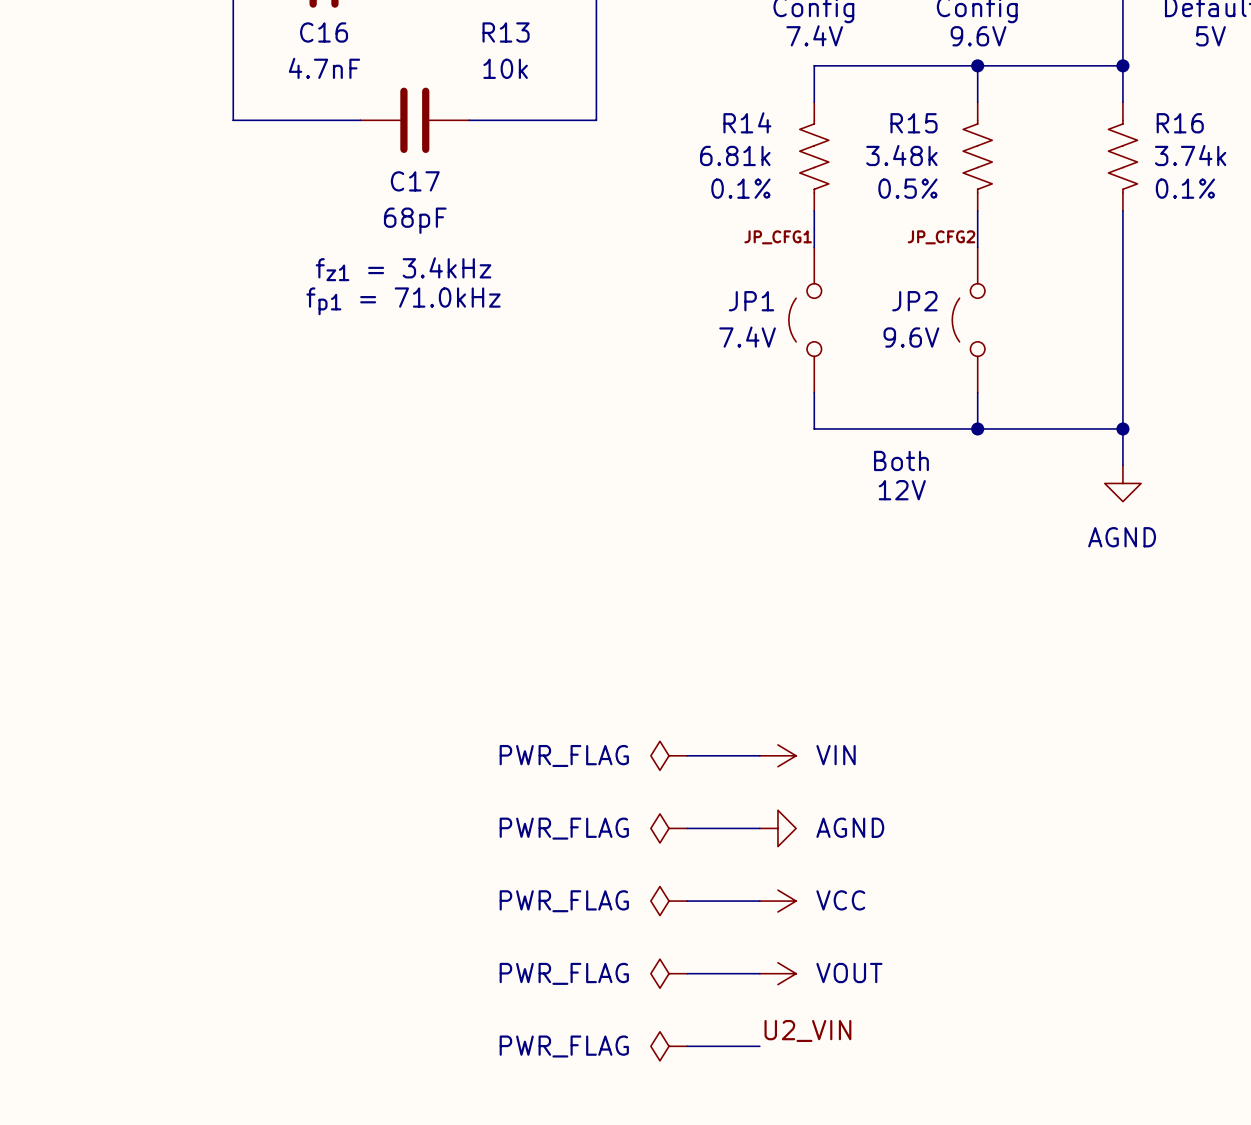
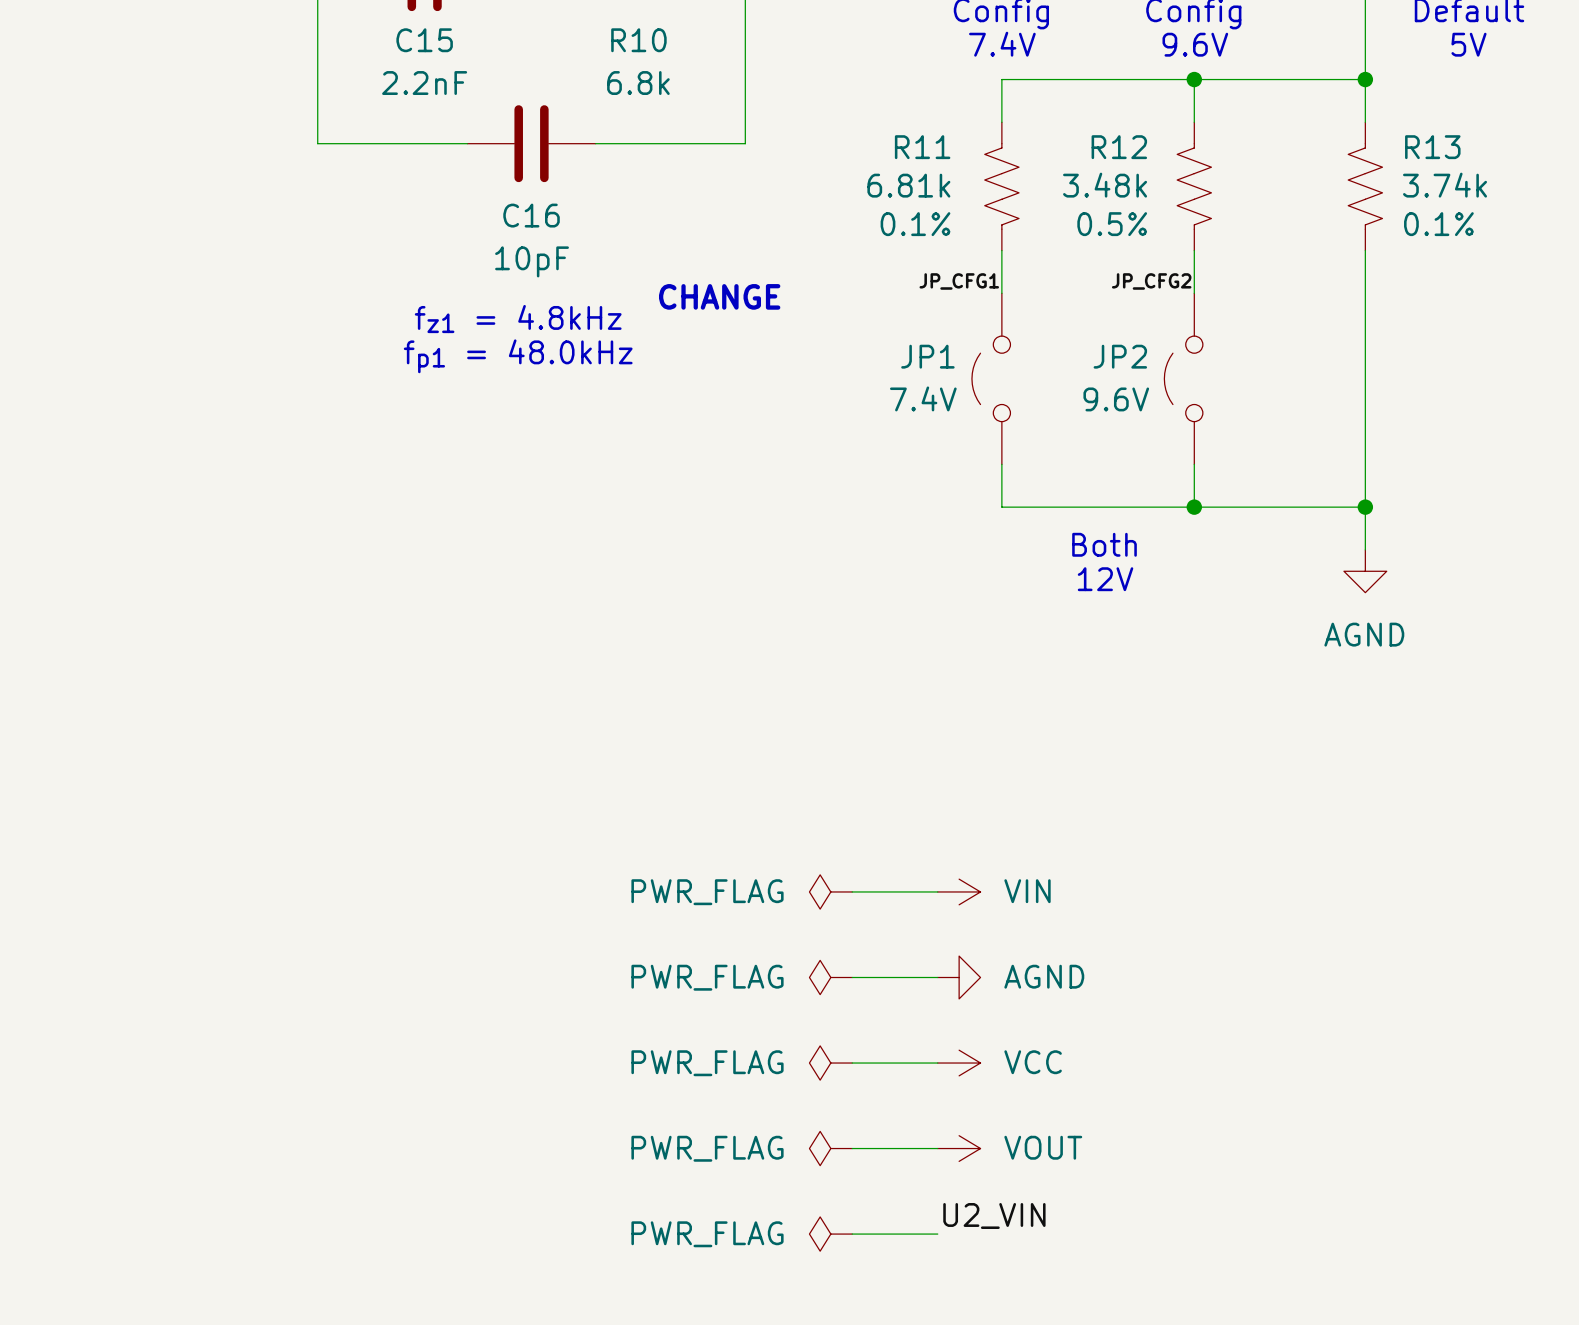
C16 name: C16 (324, 32) -> C15 (424, 40)
R13 name: R13 (506, 32) -> R10 (638, 40)
C16 value: 4.7nF (324, 68) -> 2.2nF (424, 83)
R13 value: 10k (505, 68) -> 6.8k (638, 83)
R14 name: R14 (747, 122) -> R11 (922, 147)
R15 name: R15 (914, 123) -> R12 (1119, 147)
R16 name: R16 (1180, 123) -> R13 (1432, 147)
C17 name: C17 (415, 181) -> C16 (531, 215)
C17 value: 68pF (415, 220) -> 10pF (532, 261)
text: none -> CHANGE (719, 296)
text: fz1 = 3.4kHz (403, 269) -> fz1 = 4.8kHz (518, 319)
text: fp1 = 71.0kHz (403, 301) -> fp1 = 48.0kHz (518, 356)

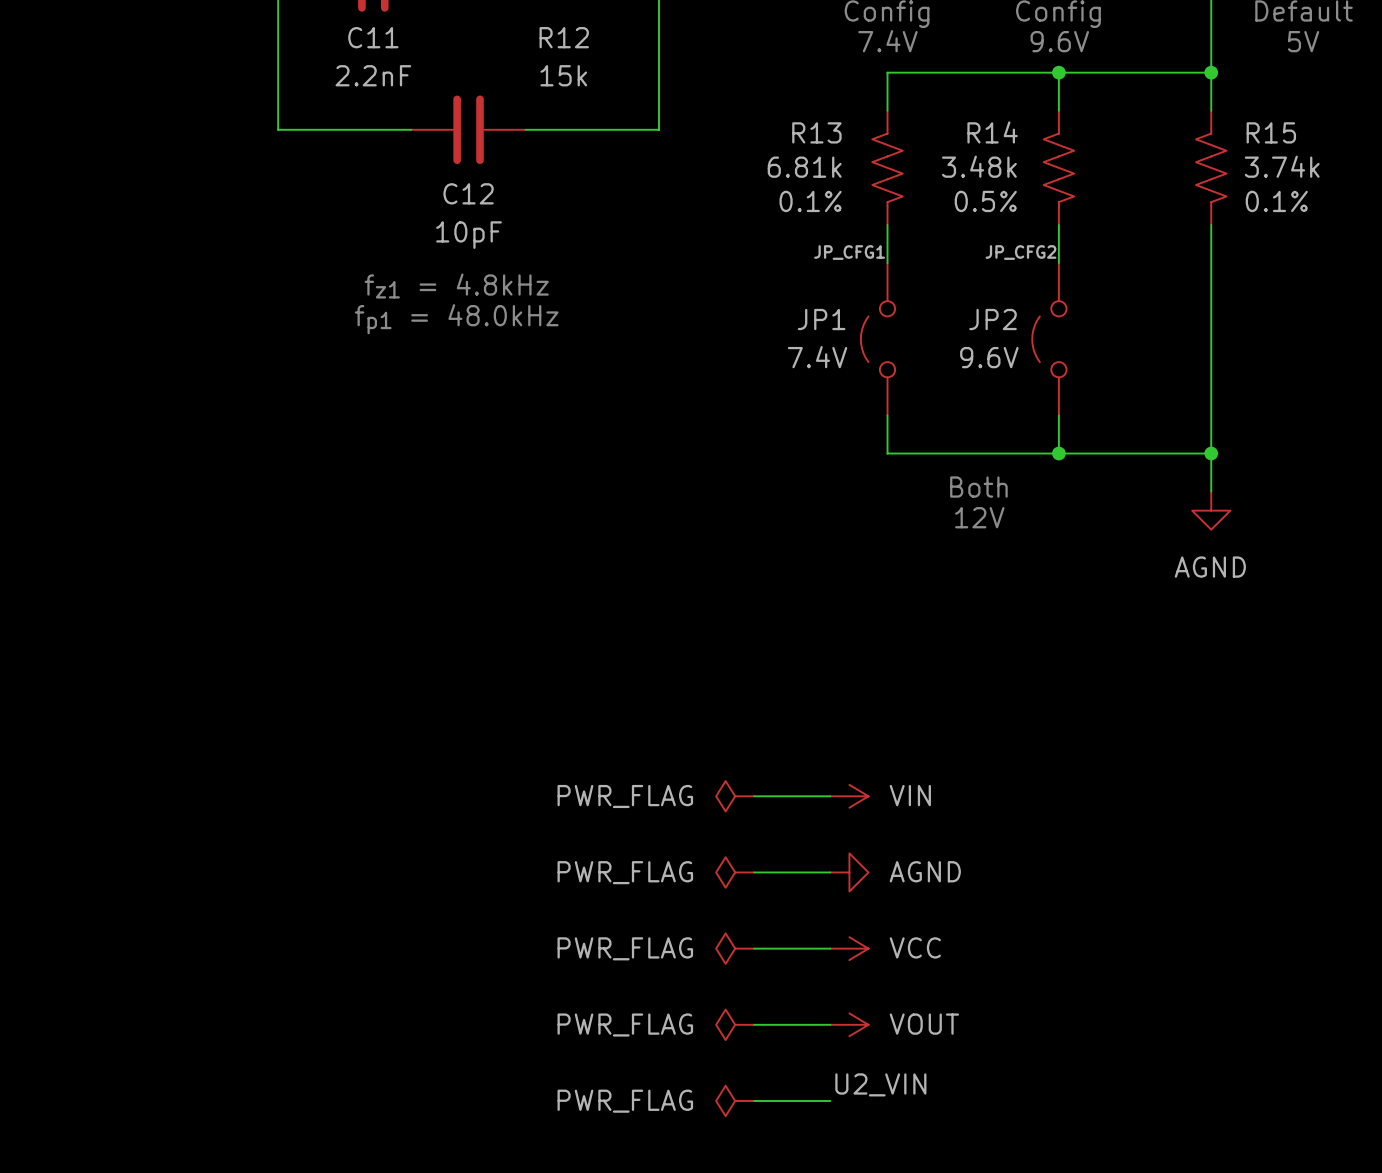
C15 name: C15 (424, 40) -> C11 (373, 37)
R10 name: R10 (638, 40) -> R12 (564, 37)
R10 value: 6.8k (638, 83) -> 15k (563, 75)
R11 name: R11 (922, 147) -> R13 (816, 132)
R12 name: R12 (1119, 147) -> R14 (992, 132)
R13 name: R13 (1432, 147) -> R15 (1271, 132)
C16 name: C16 (531, 215) -> C12 (468, 193)
text: CHANGE (719, 296) -> none

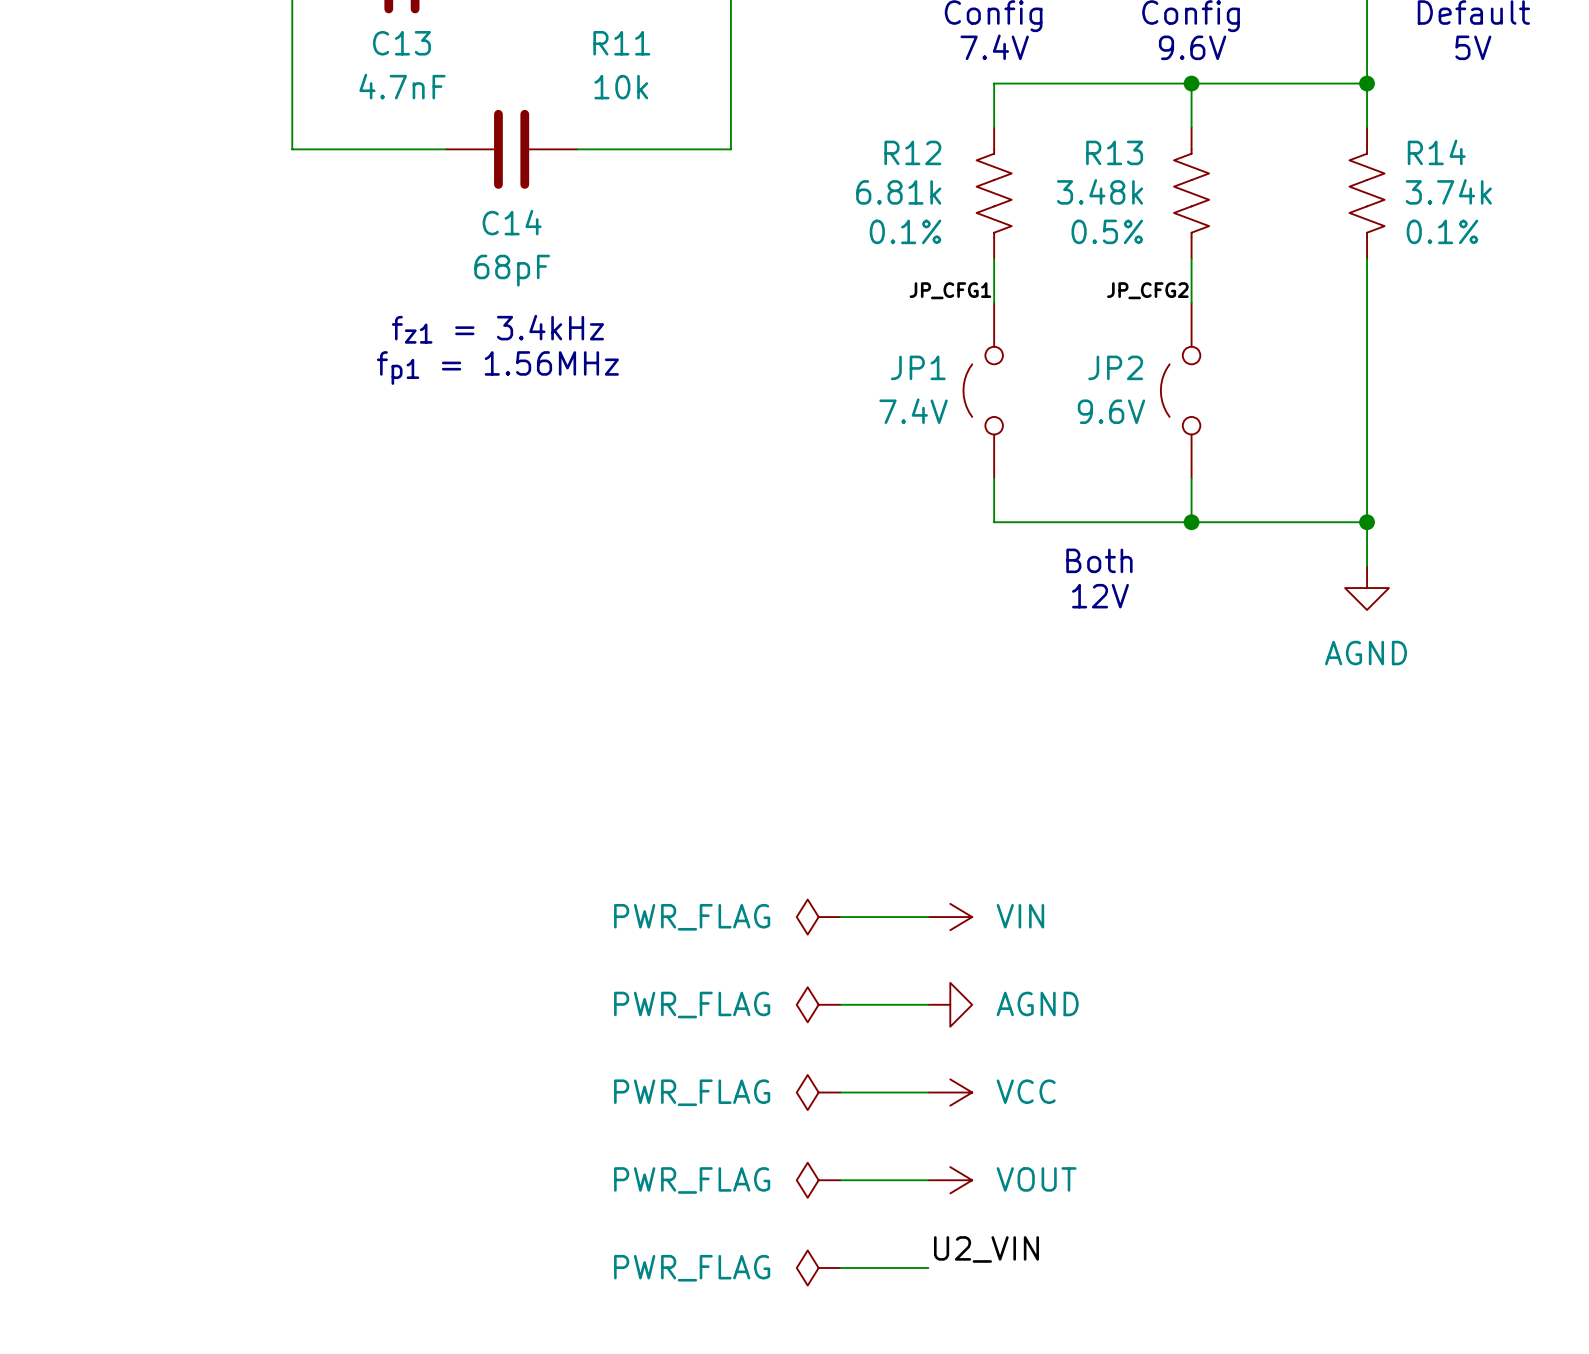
C11 name: C11 (373, 37) -> C13 (401, 43)
R12 name: R12 (564, 37) -> R11 (621, 43)
C11 value: 2.2nF (373, 75) -> 4.7nF (402, 86)
R12 value: 15k (563, 75) -> 10k (621, 87)
R13 name: R13 (816, 132) -> R12 (912, 152)
R14 name: R14 (992, 132) -> R13 (1114, 152)
R15 name: R15 (1271, 132) -> R14 (1436, 152)
C12 name: C12 (468, 193) -> C14 (512, 222)
C12 value: 10pF (469, 235) -> 68pF (512, 270)
text: fz1 = 4.8kHz (456, 285) -> fz1 = 3.4kHz (497, 329)
text: fp1 = 48.0kHz (456, 319) -> fp1 = 1.56MHz (497, 368)

